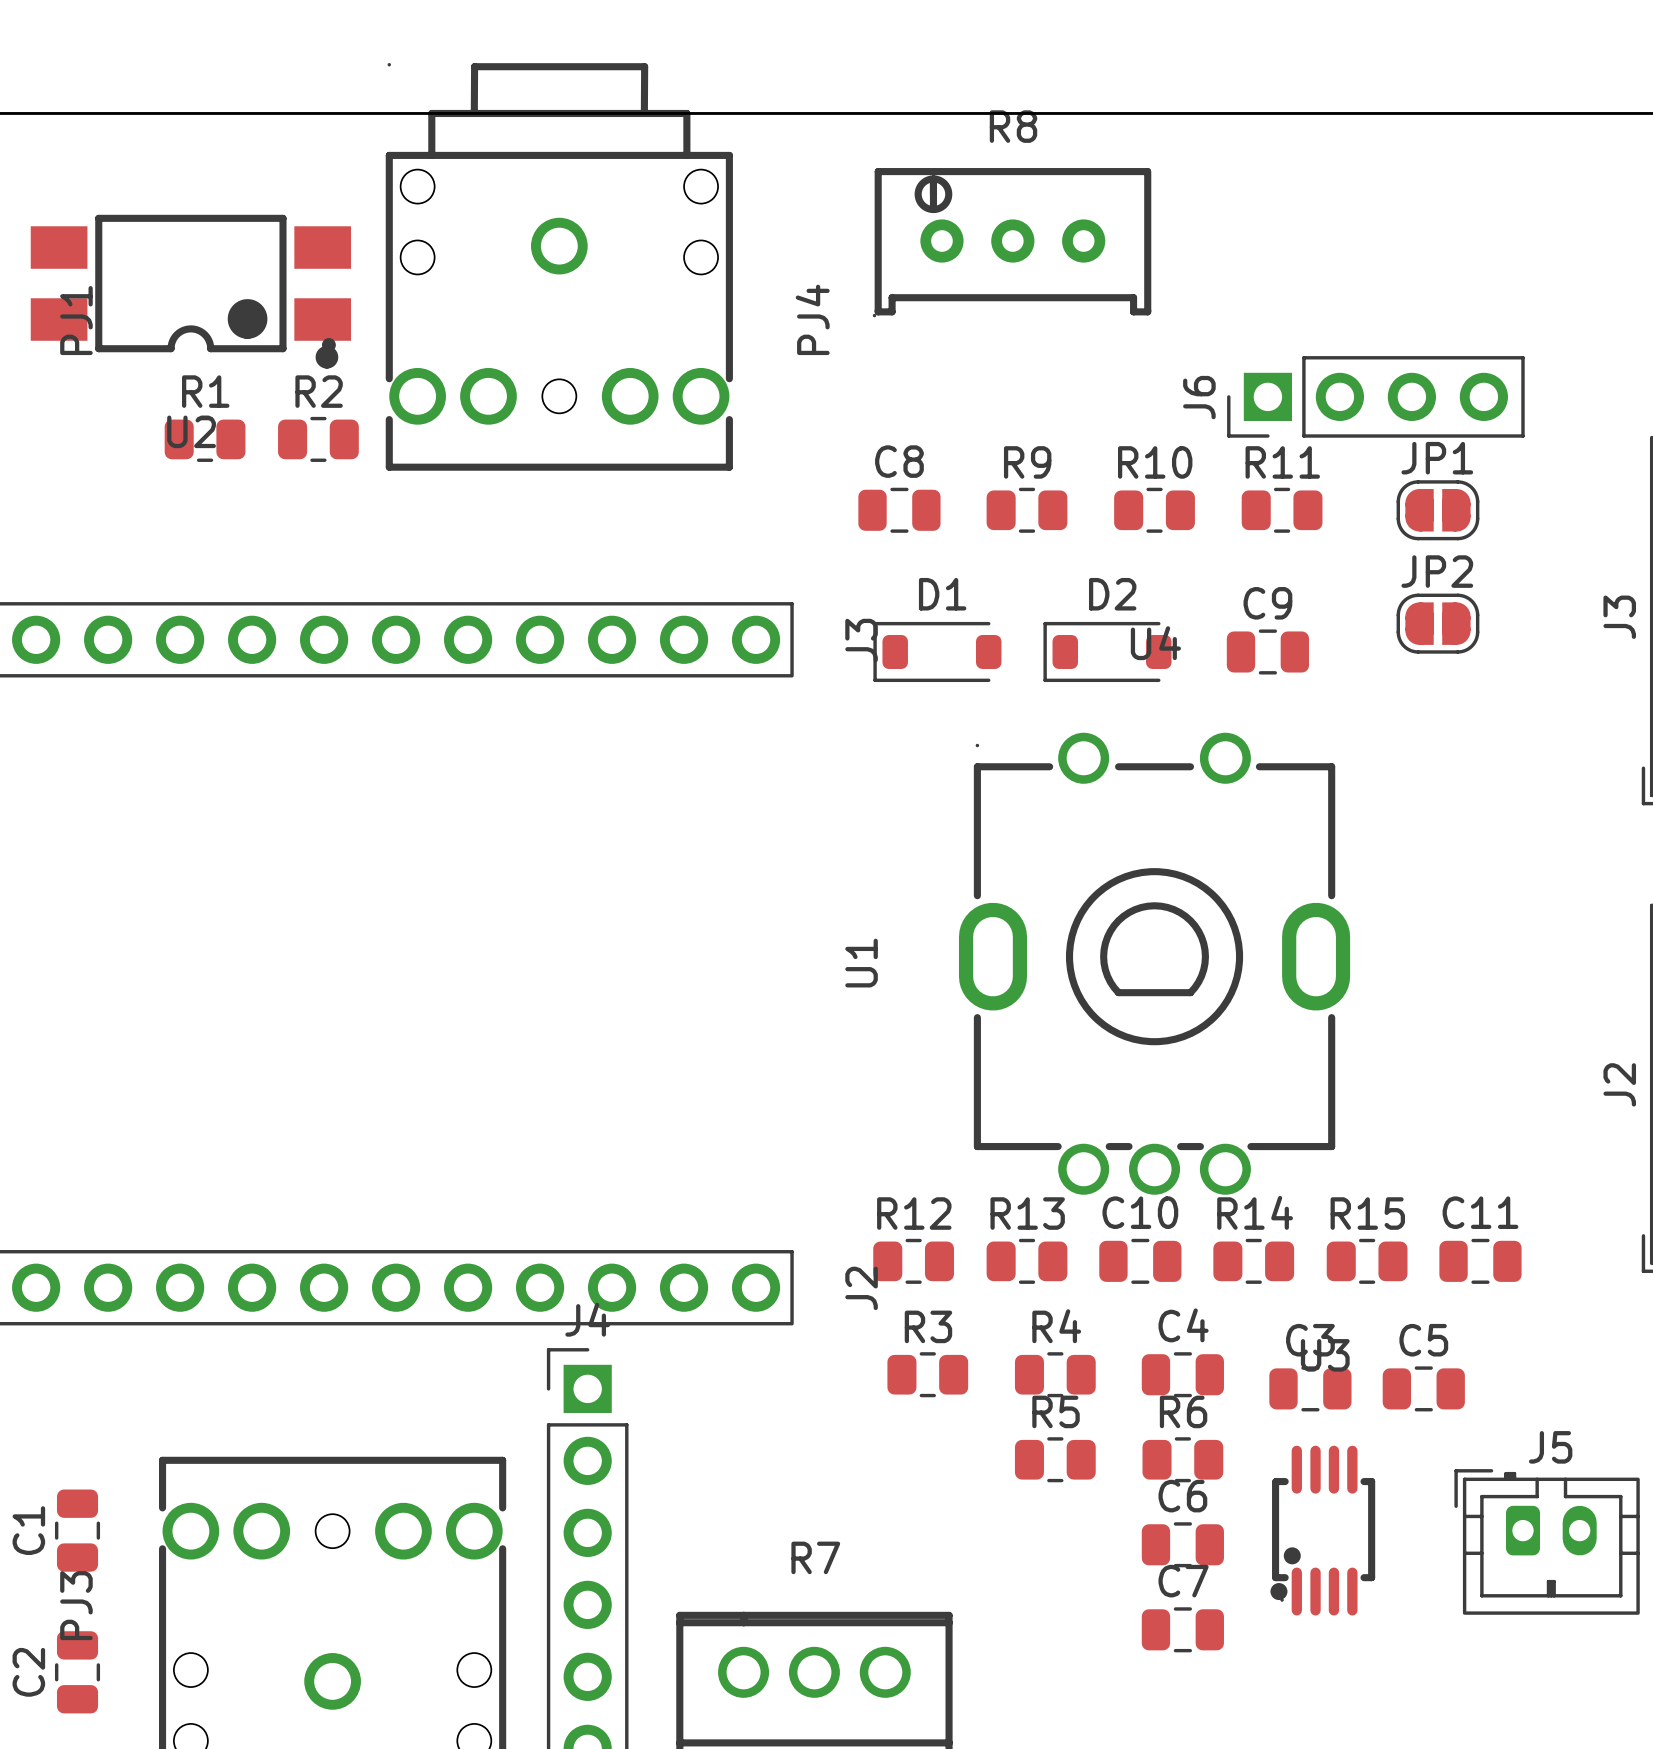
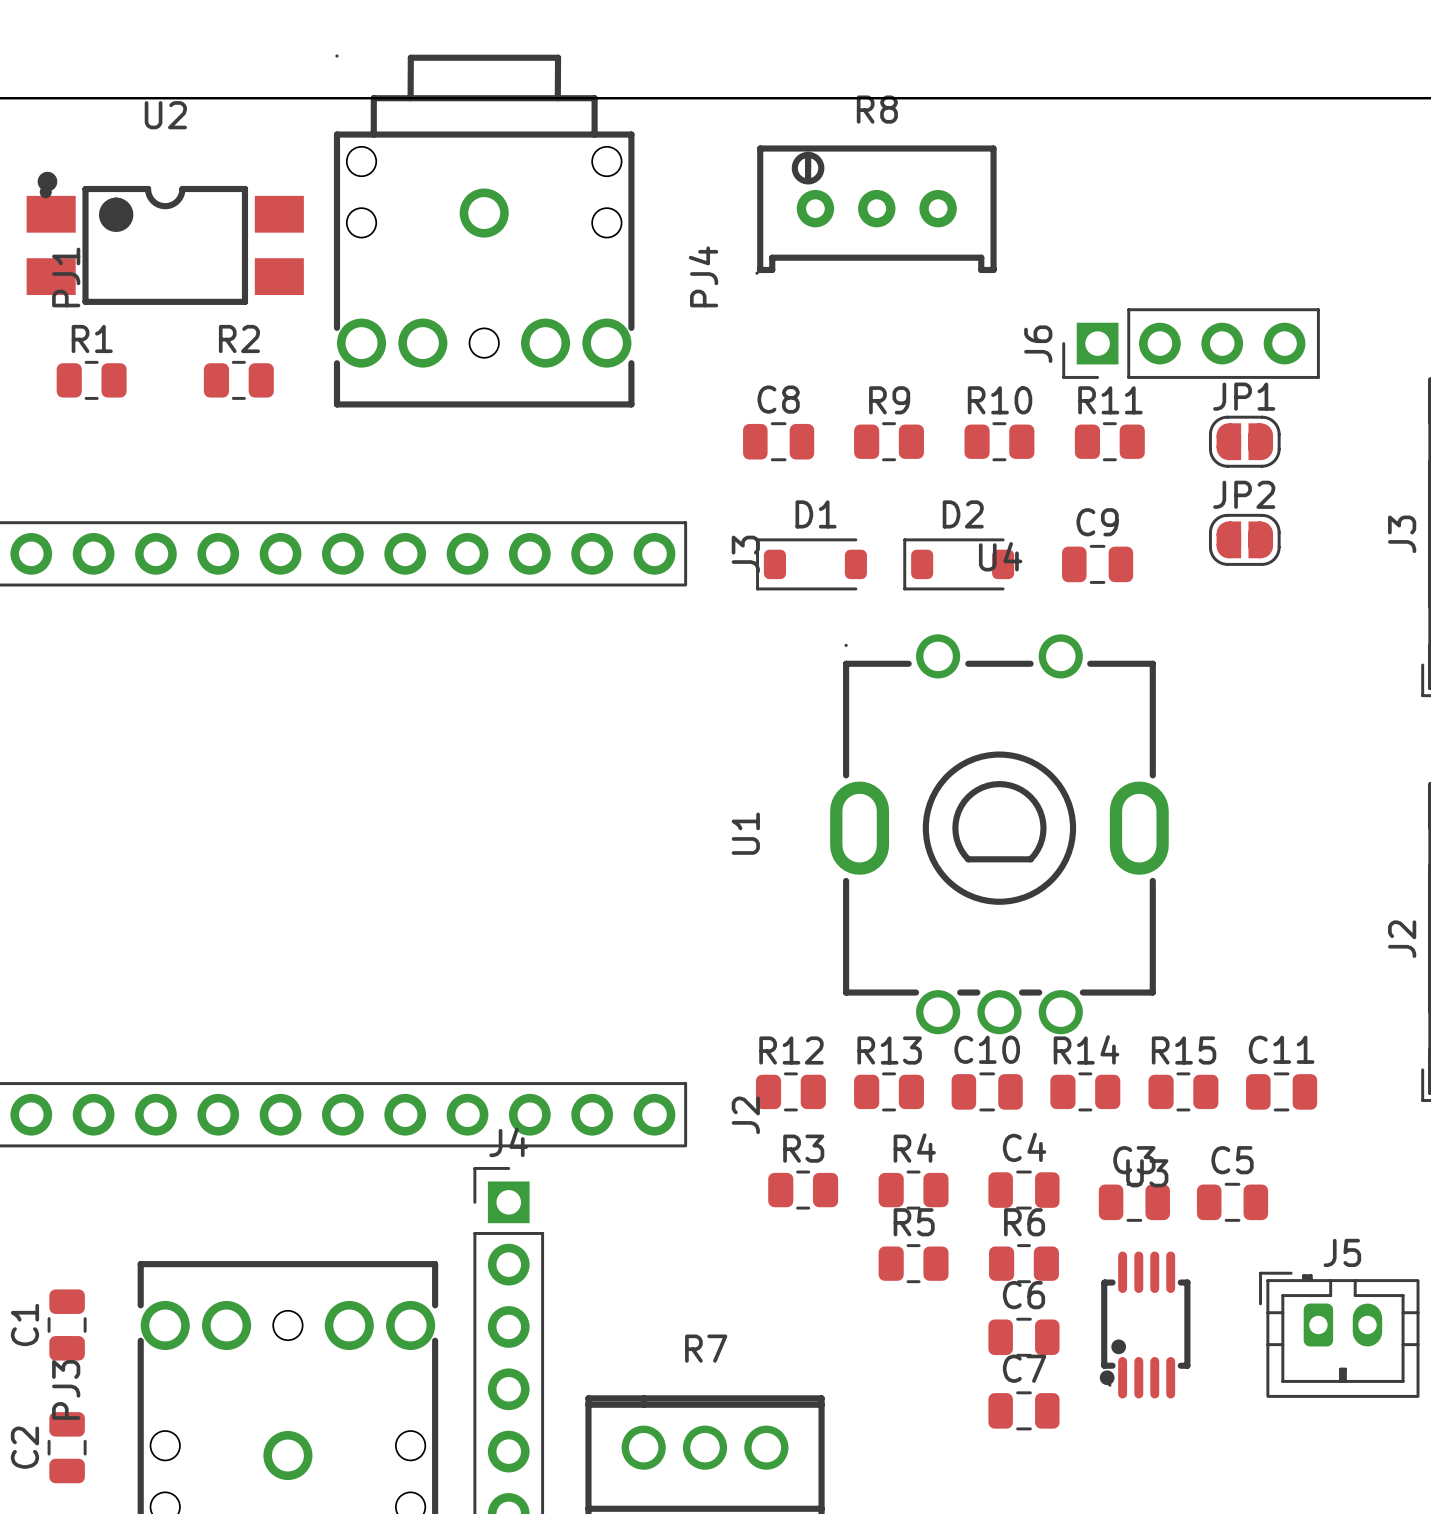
U2 rotation: 0° (190, 291) -> 180° (165, 238)
R1 position: (205, 439) -> (91, 380)
R2 position: (318, 439) -> (238, 380)

